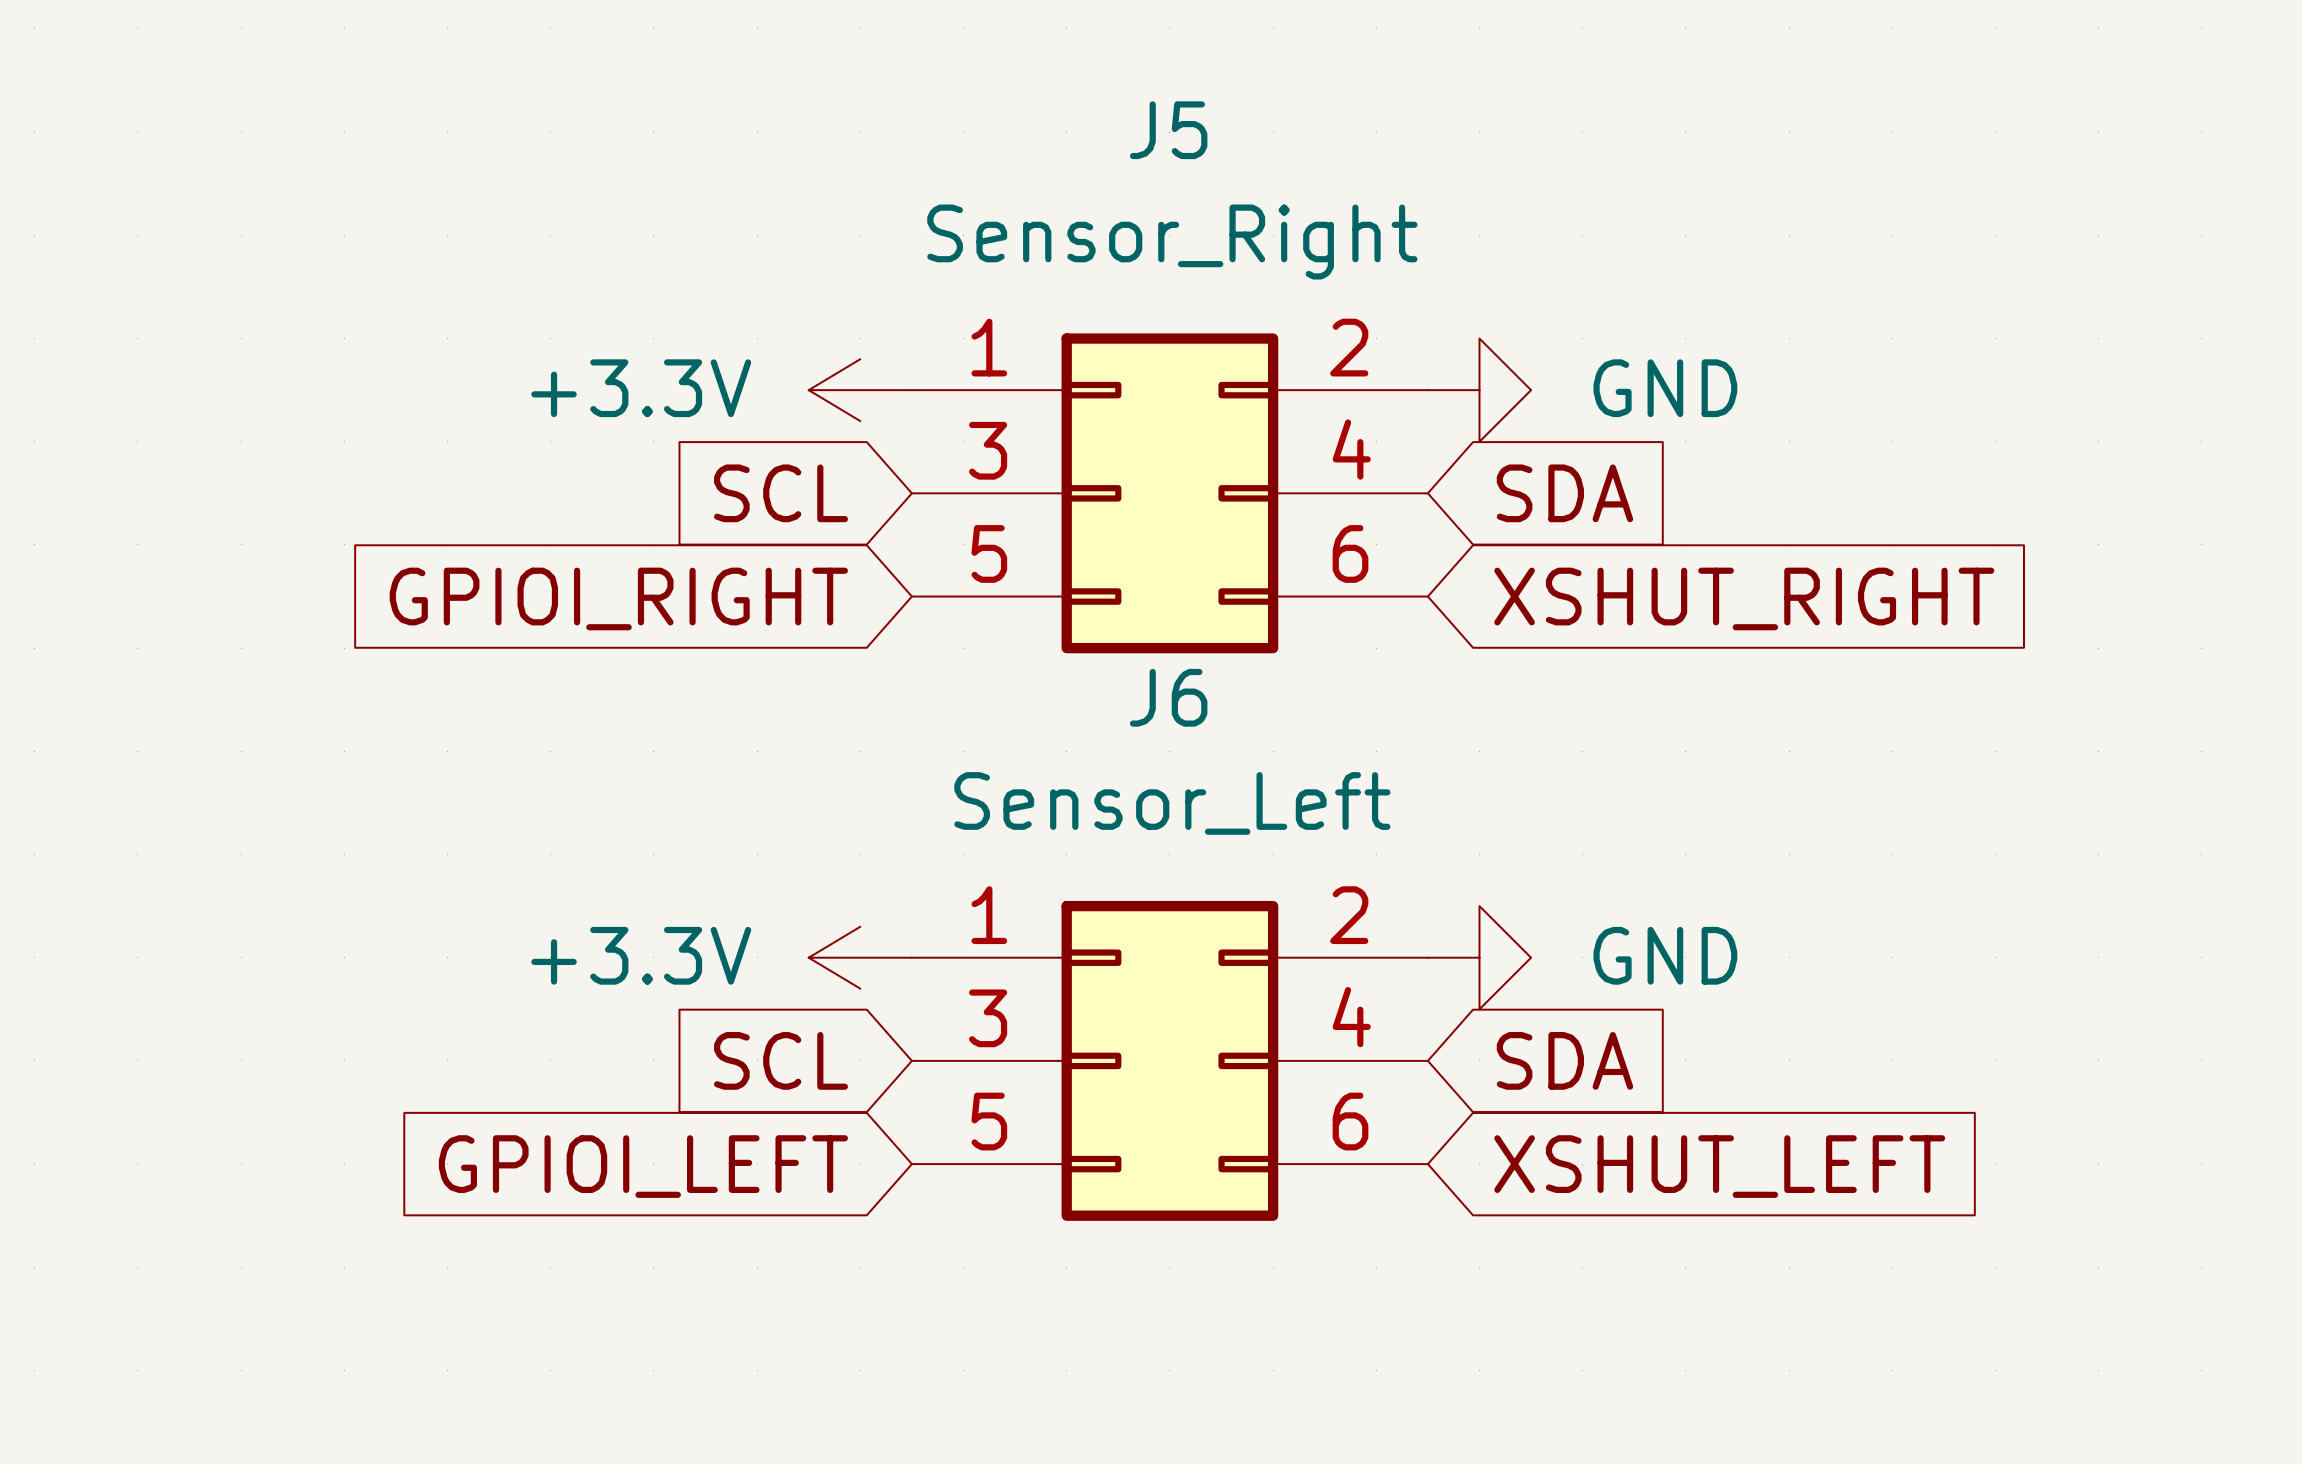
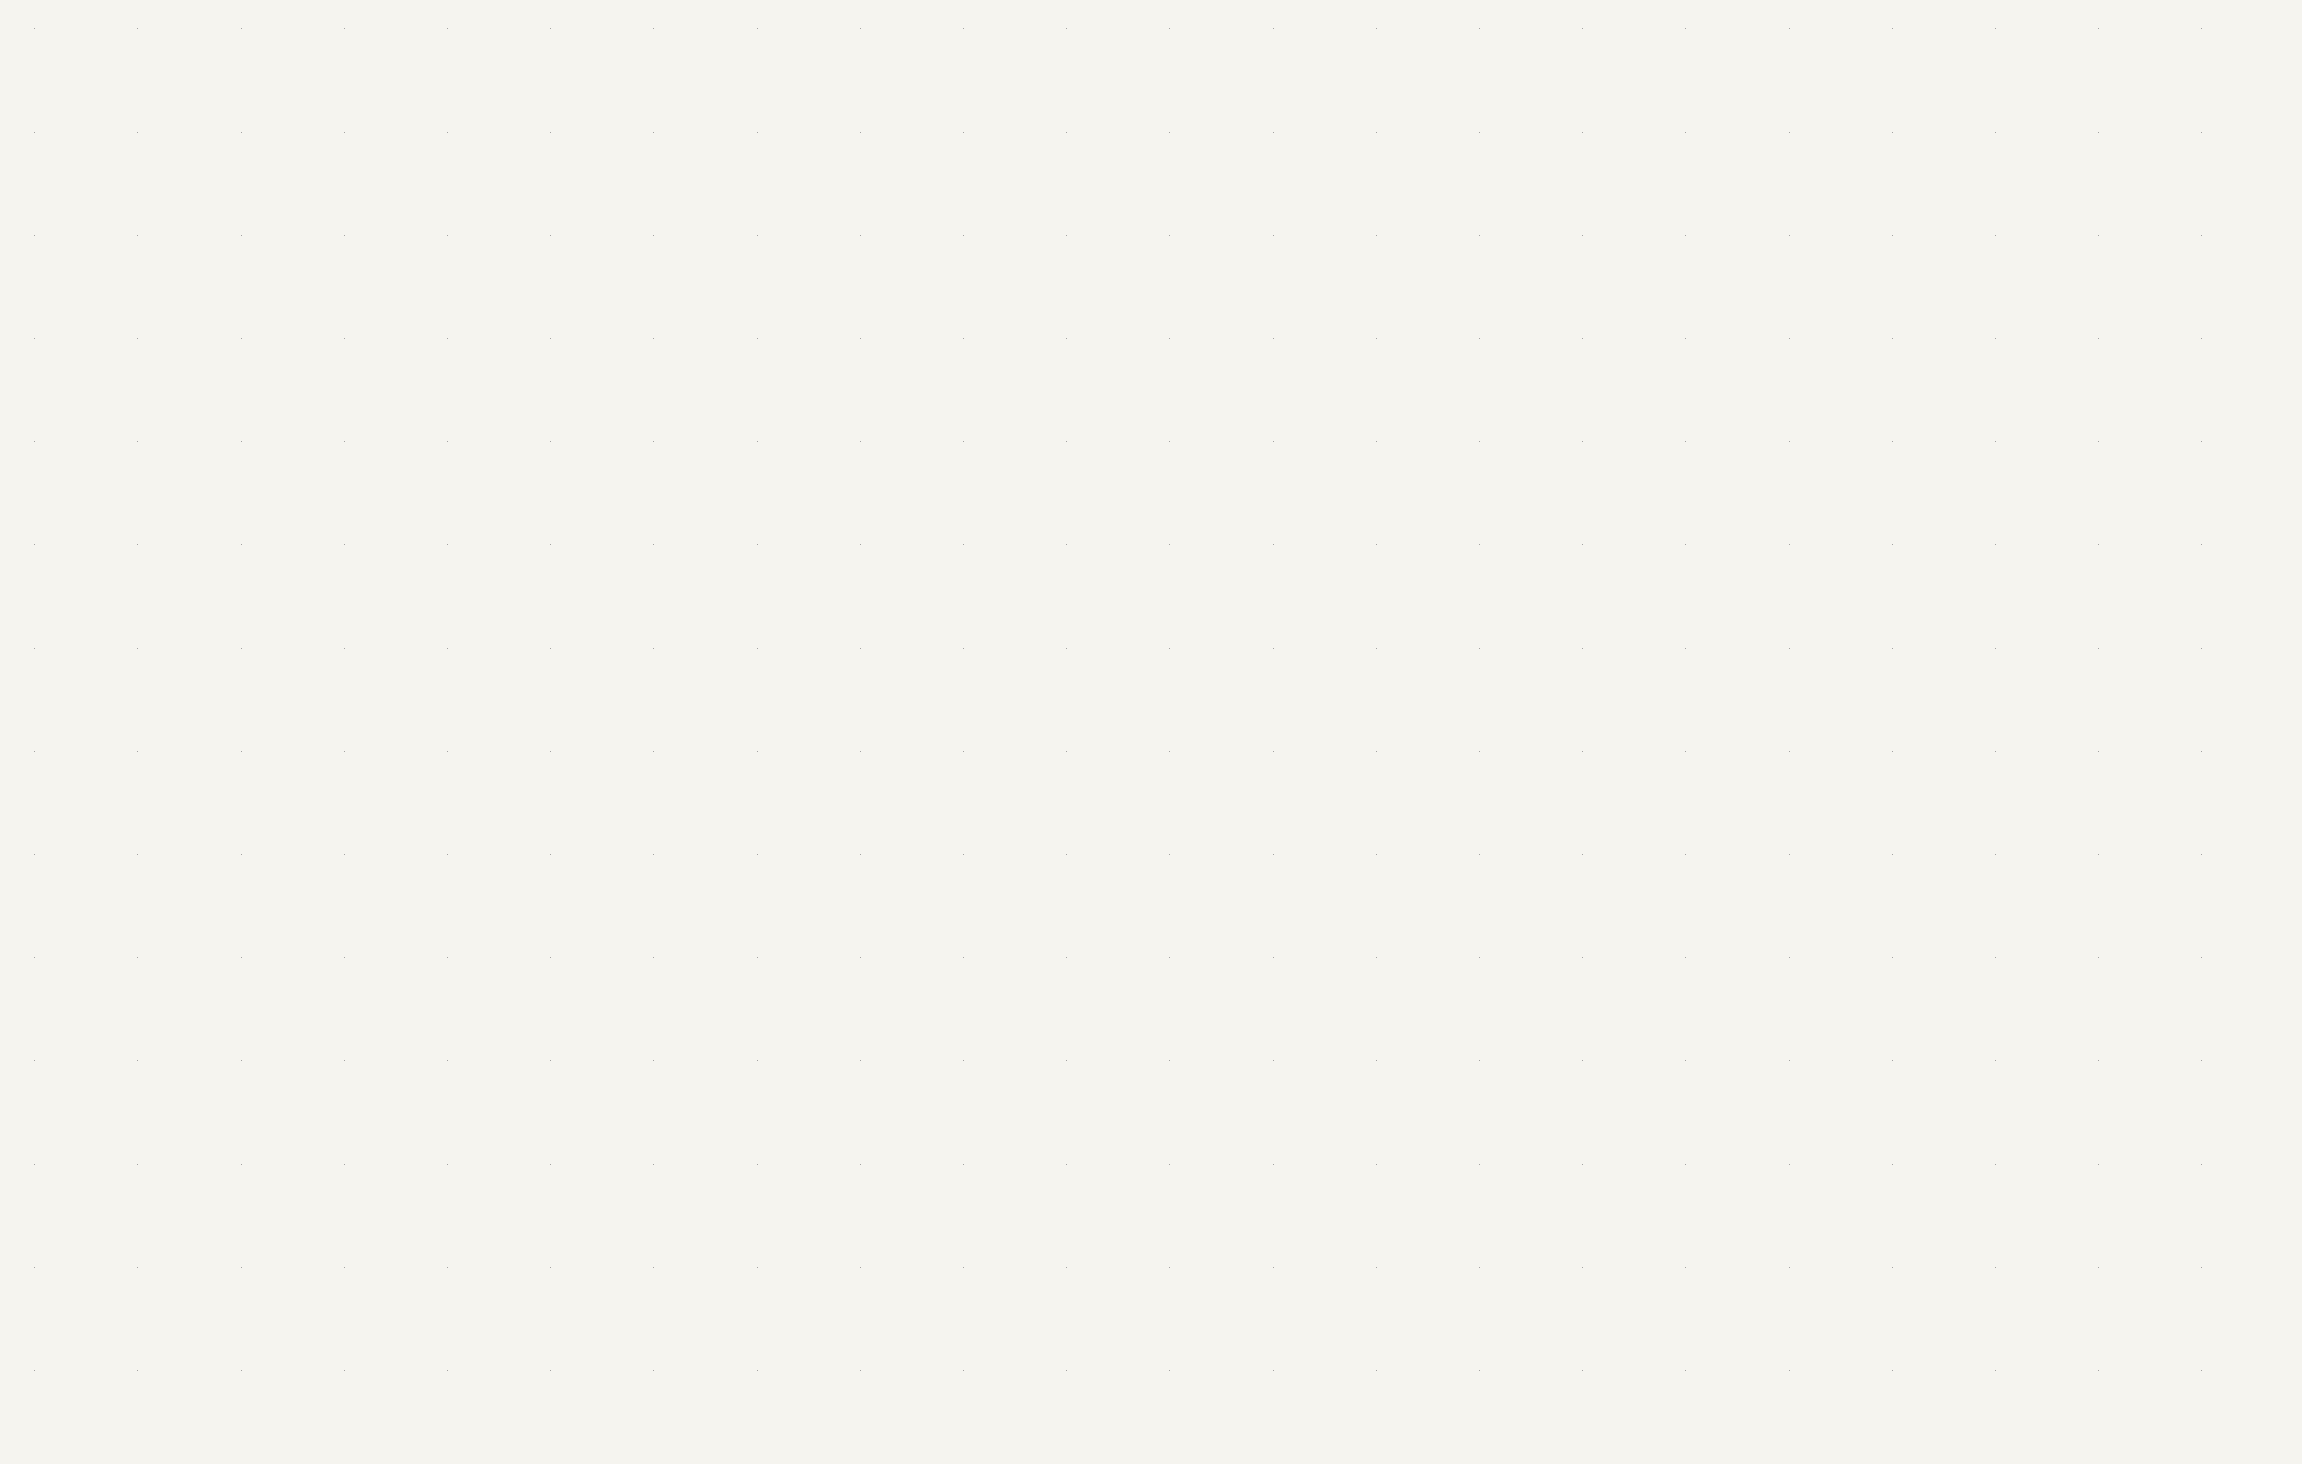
power symbol: +3.3V (860, 390) -> none
power symbol: GND (1479, 390) -> none
global label: SCL (781, 493) -> none
J5: Sensor_Right (1169, 493) -> none
global label: SDA (1564, 493) -> none
global label: GPIOI_RIGHT (618, 598) -> none
global label: XSHUT_RIGHT (1744, 598) -> none
power symbol: +3.3V (860, 957) -> none
power symbol: GND (1479, 957) -> none
global label: SCL (781, 1060) -> none
J6: Sensor_Left (1169, 1060) -> none
global label: SDA (1564, 1060) -> none
global label: GPIOI_LEFT (643, 1166) -> none
global label: XSHUT_LEFT (1719, 1166) -> none

